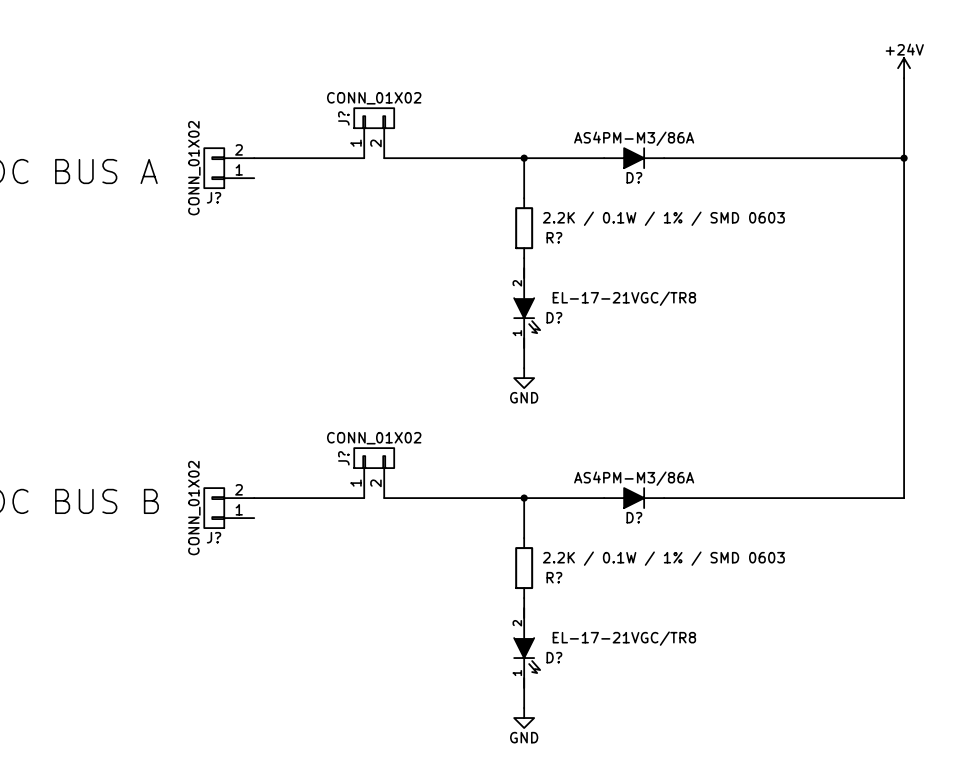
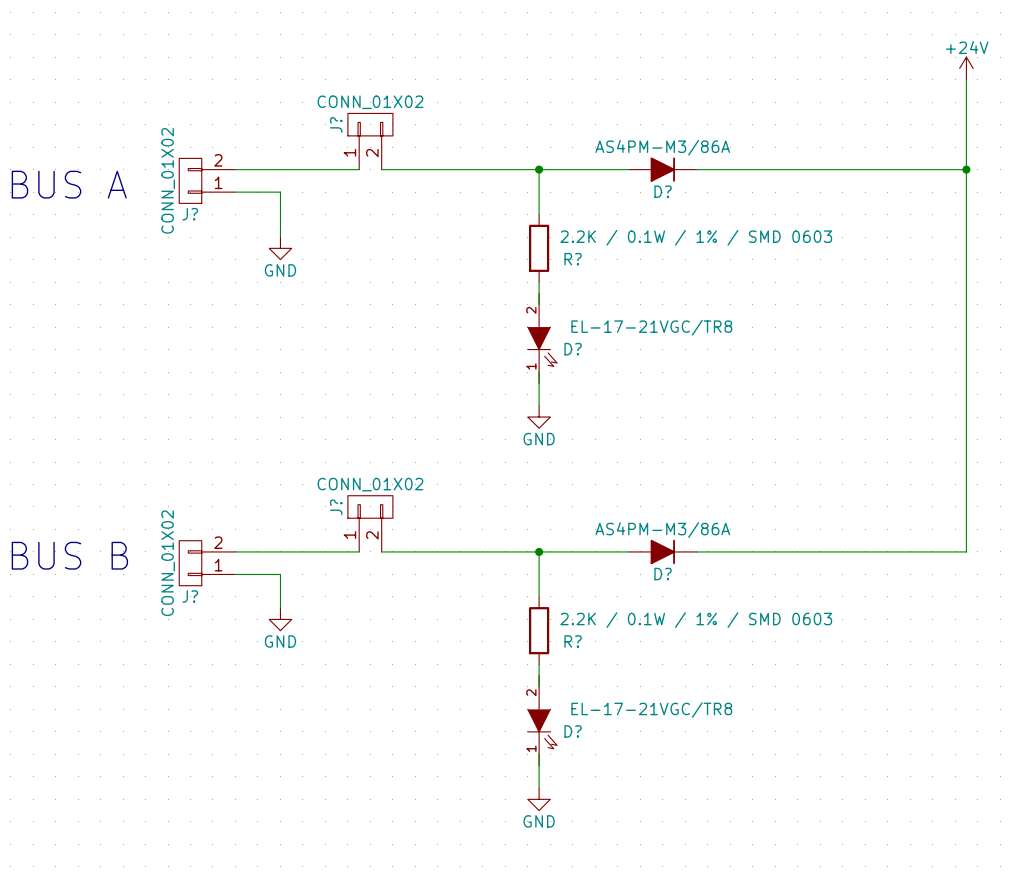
wire: none -> (235, 192) (280, 192) (280, 237)
power symbol: none -> GND (280, 248)
wire: none -> (235, 574) (280, 574) (280, 608)
power symbol: none -> GND (280, 619)

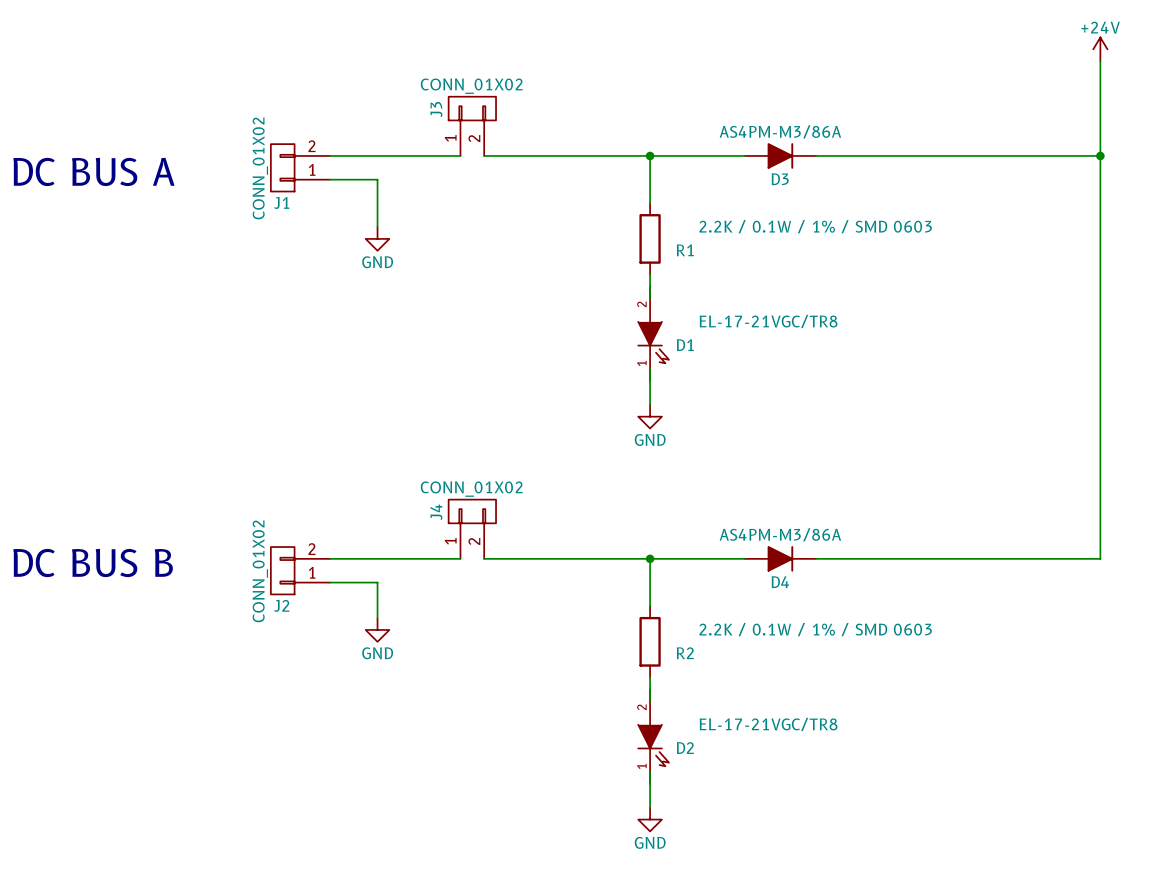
J? name: J? (336, 124) -> J3 (436, 109)
D? name: D? (663, 191) -> D3 (780, 179)
J? name: J? (190, 214) -> J1 (281, 202)
R? name: R? (573, 259) -> R1 (685, 250)
D? name: D? (573, 349) -> D1 (685, 345)
J? name: J? (336, 507) -> J4 (436, 512)
D? name: D? (663, 574) -> D4 (780, 582)
J? name: J? (190, 596) -> J2 (281, 605)
R? name: R? (573, 641) -> R2 (685, 653)
D? name: D? (573, 731) -> D2 (685, 748)

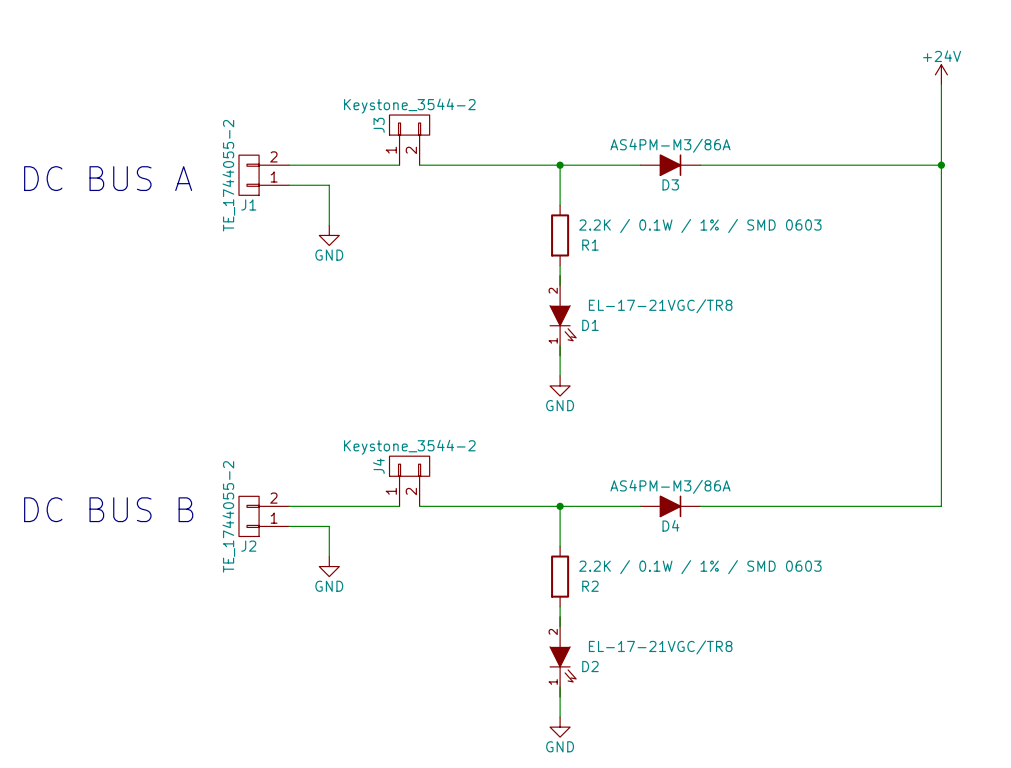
J3 value: CONN_01X02 (471, 86) -> Keystone_3544-2 (409, 106)
J1 value: CONN_01X02 (260, 168) -> TE_1744055-2 (228, 175)
J4 value: CONN_01X02 (471, 489) -> Keystone_3544-2 (409, 447)
J2 value: CONN_01X02 (260, 571) -> TE_1744055-2 (228, 516)

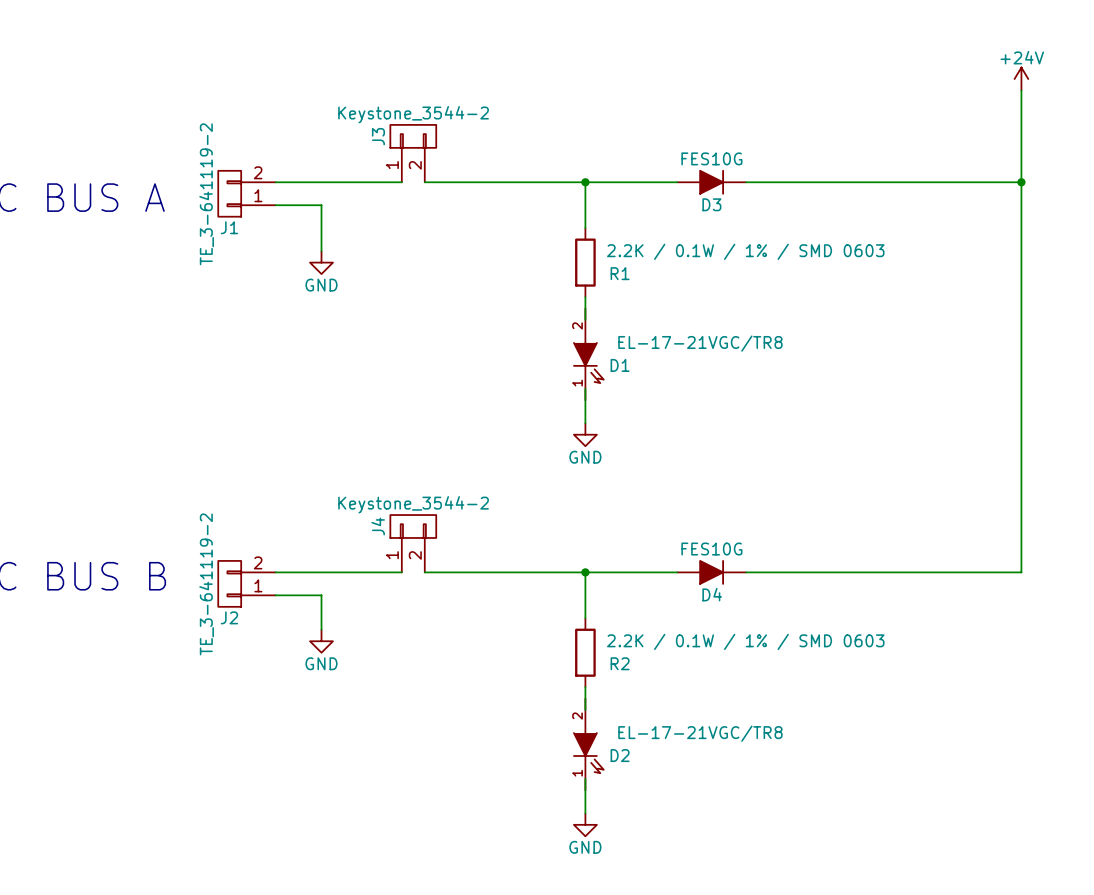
D3 value: AS4PM-M3/86A (670, 145) -> FES10G (711, 158)
J1 value: TE_1744055-2 (228, 175) -> TE_3-641119-2 (206, 194)
D4 value: AS4PM-M3/86A (670, 486) -> FES10G (711, 549)
J2 value: TE_1744055-2 (228, 516) -> TE_3-641119-2 (206, 584)

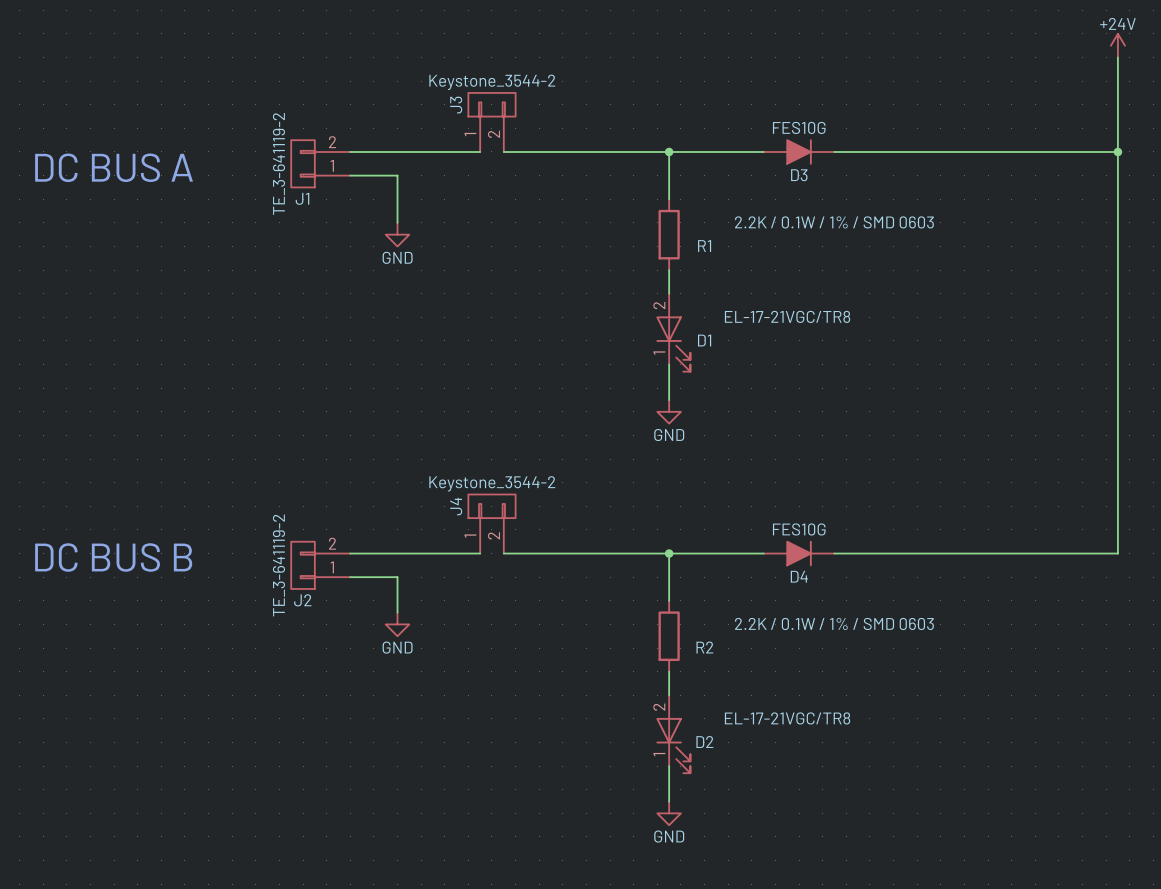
D1 symbol: [573, 308, 604, 401] -> [656, 293, 691, 372]
D2 symbol: [573, 698, 604, 791] -> [656, 695, 691, 774]

